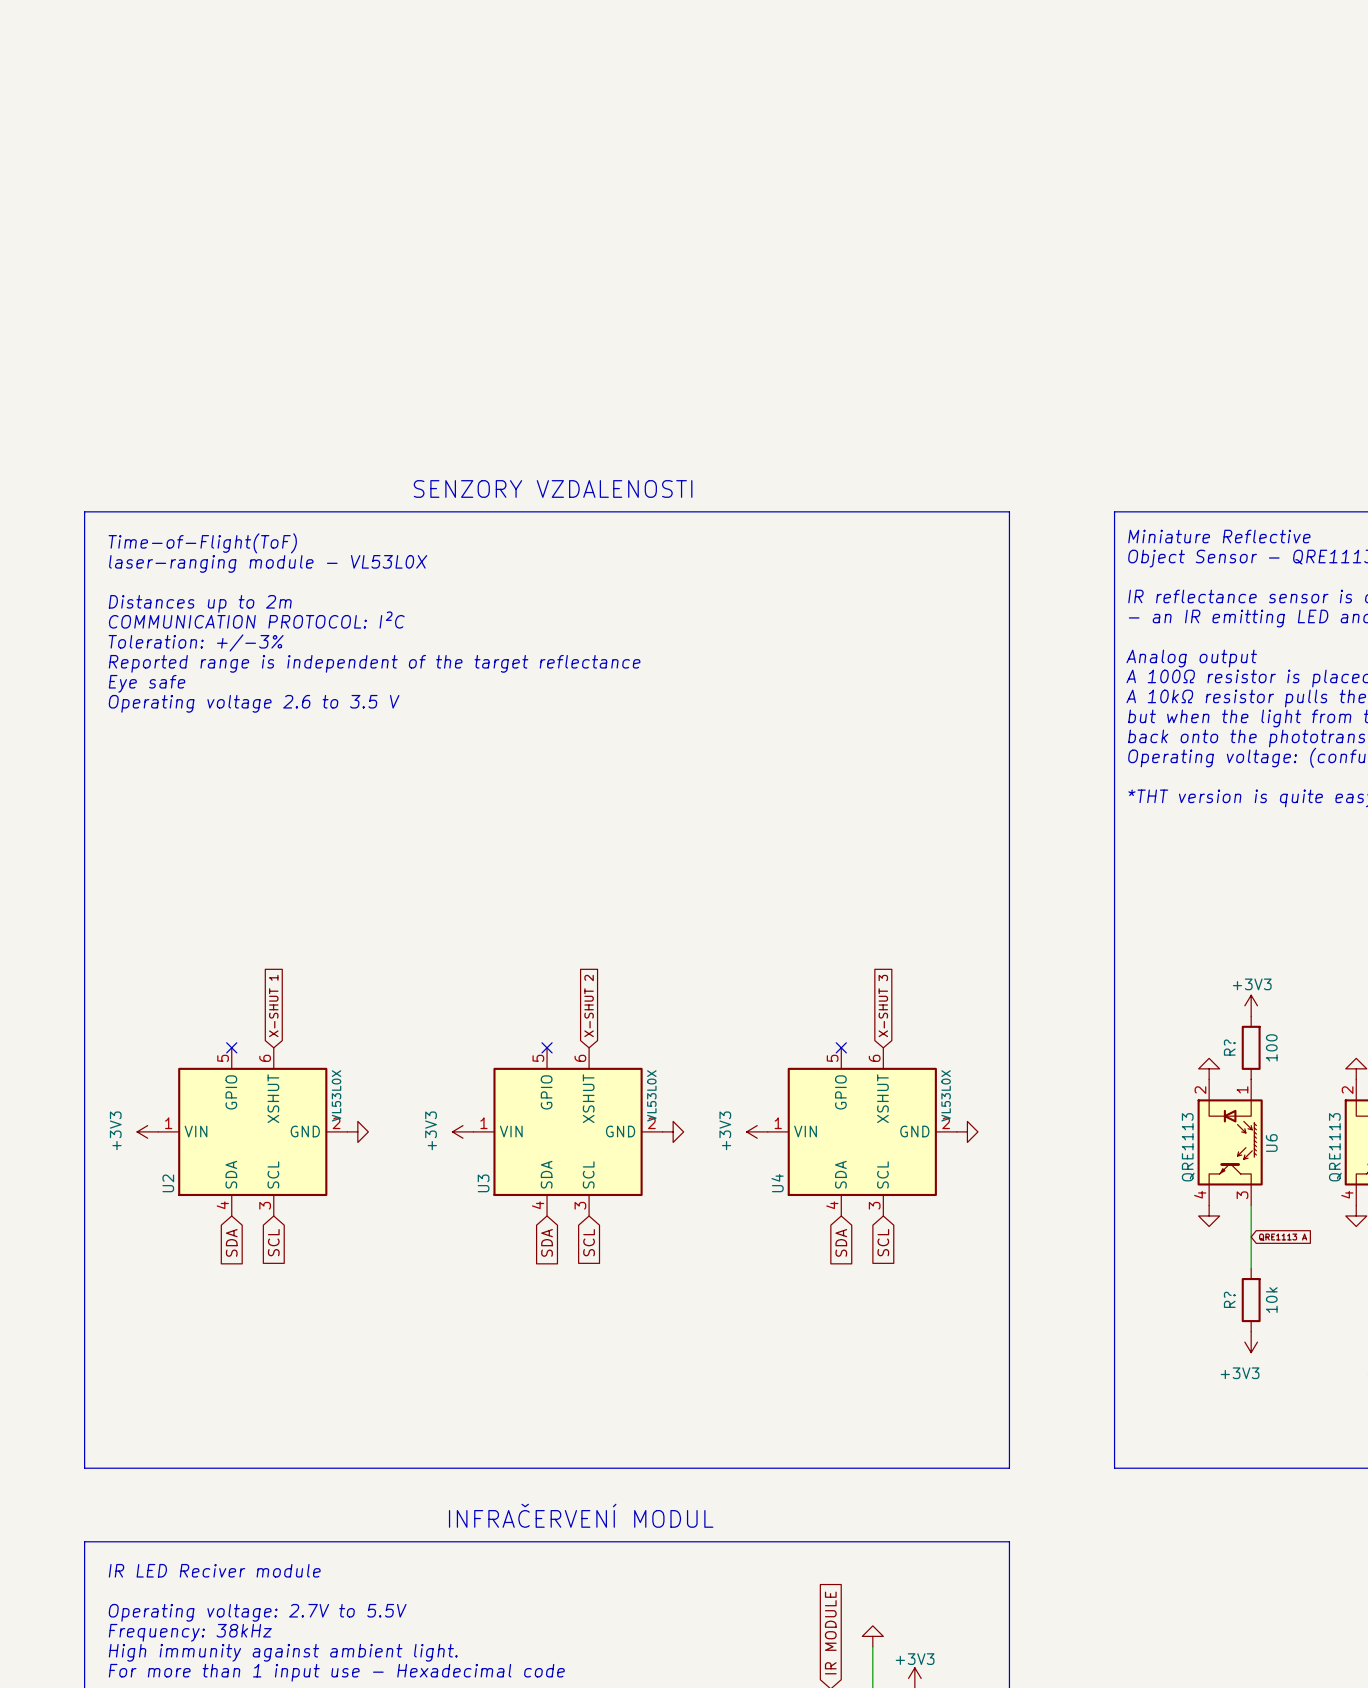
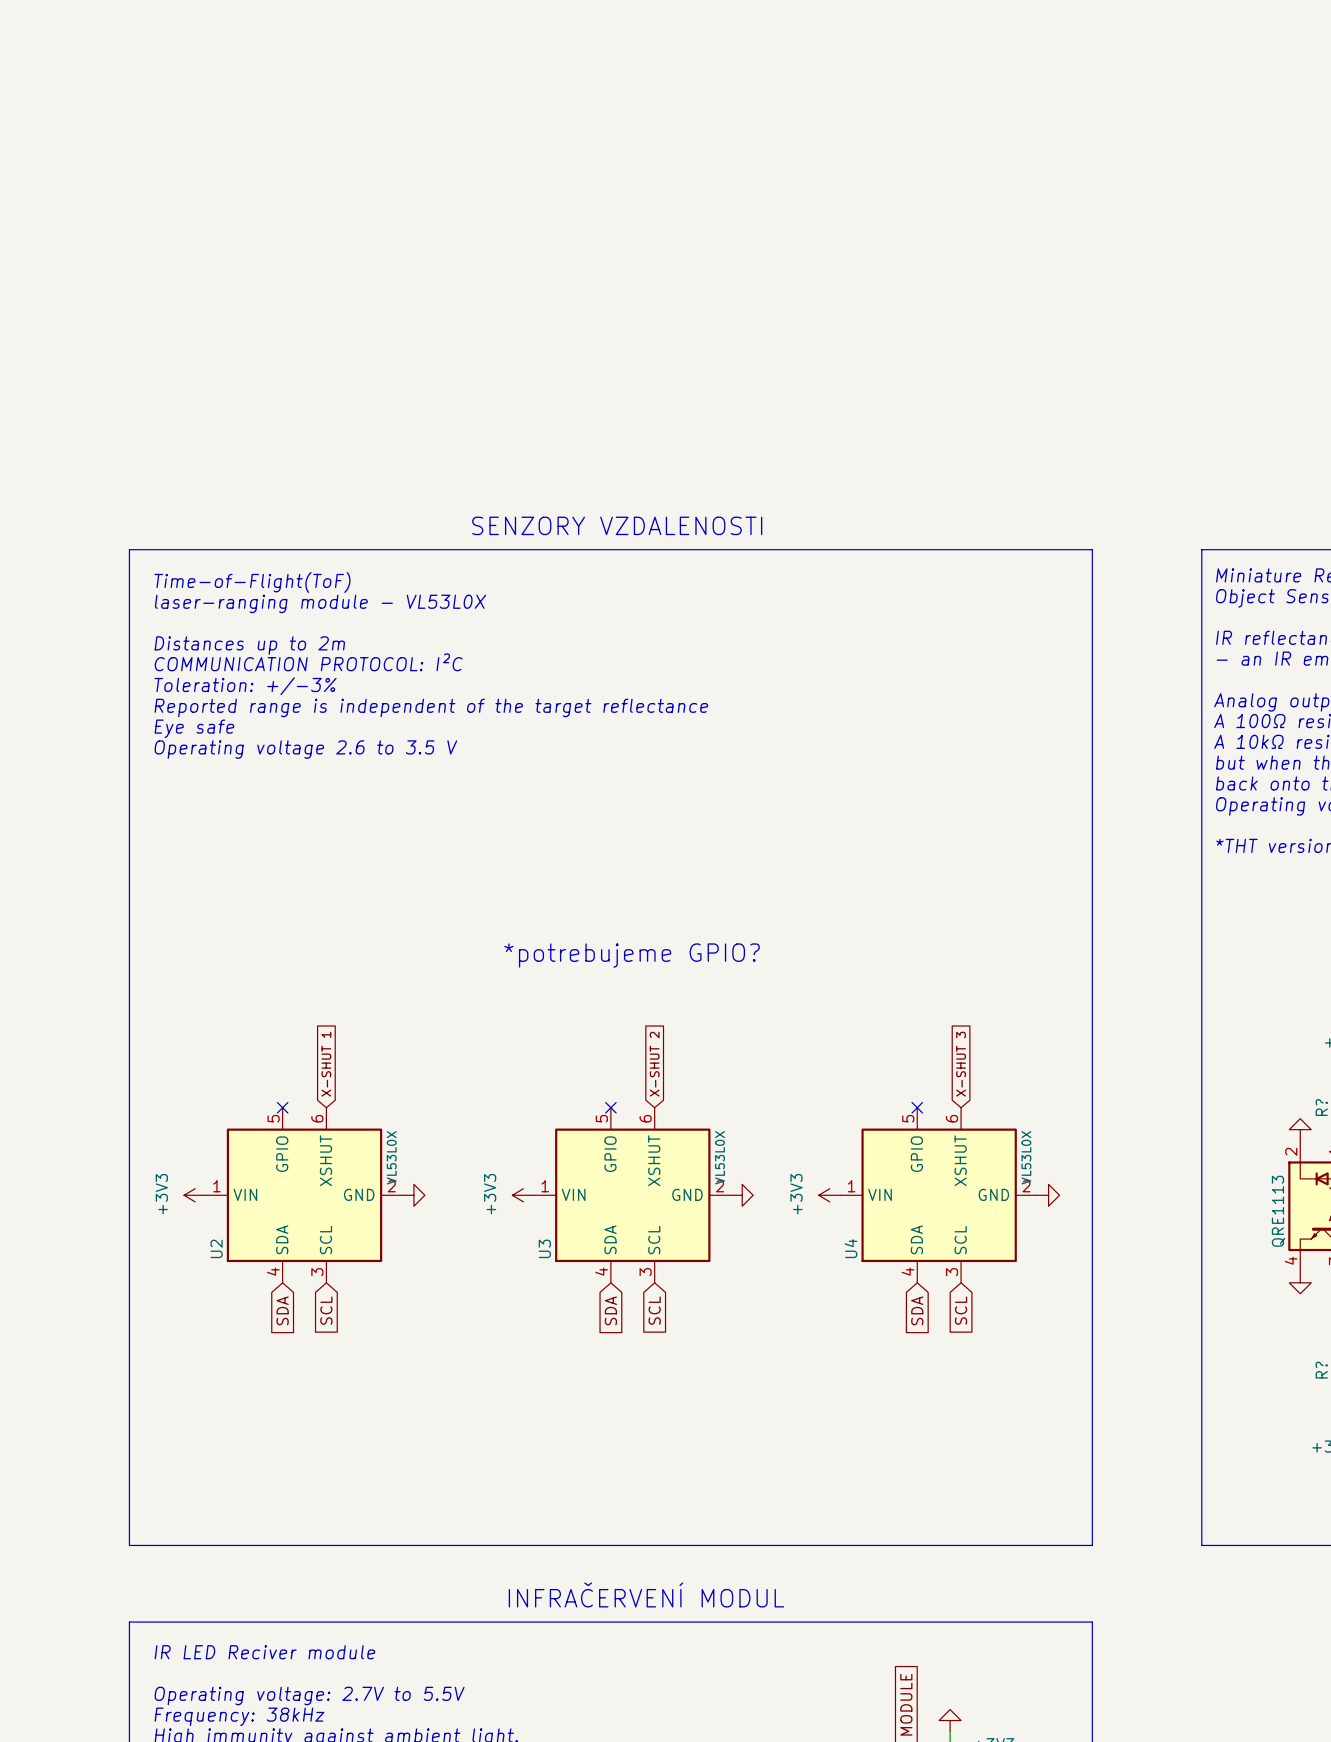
text: none -> *potrebujeme GPIO? (631, 955)

